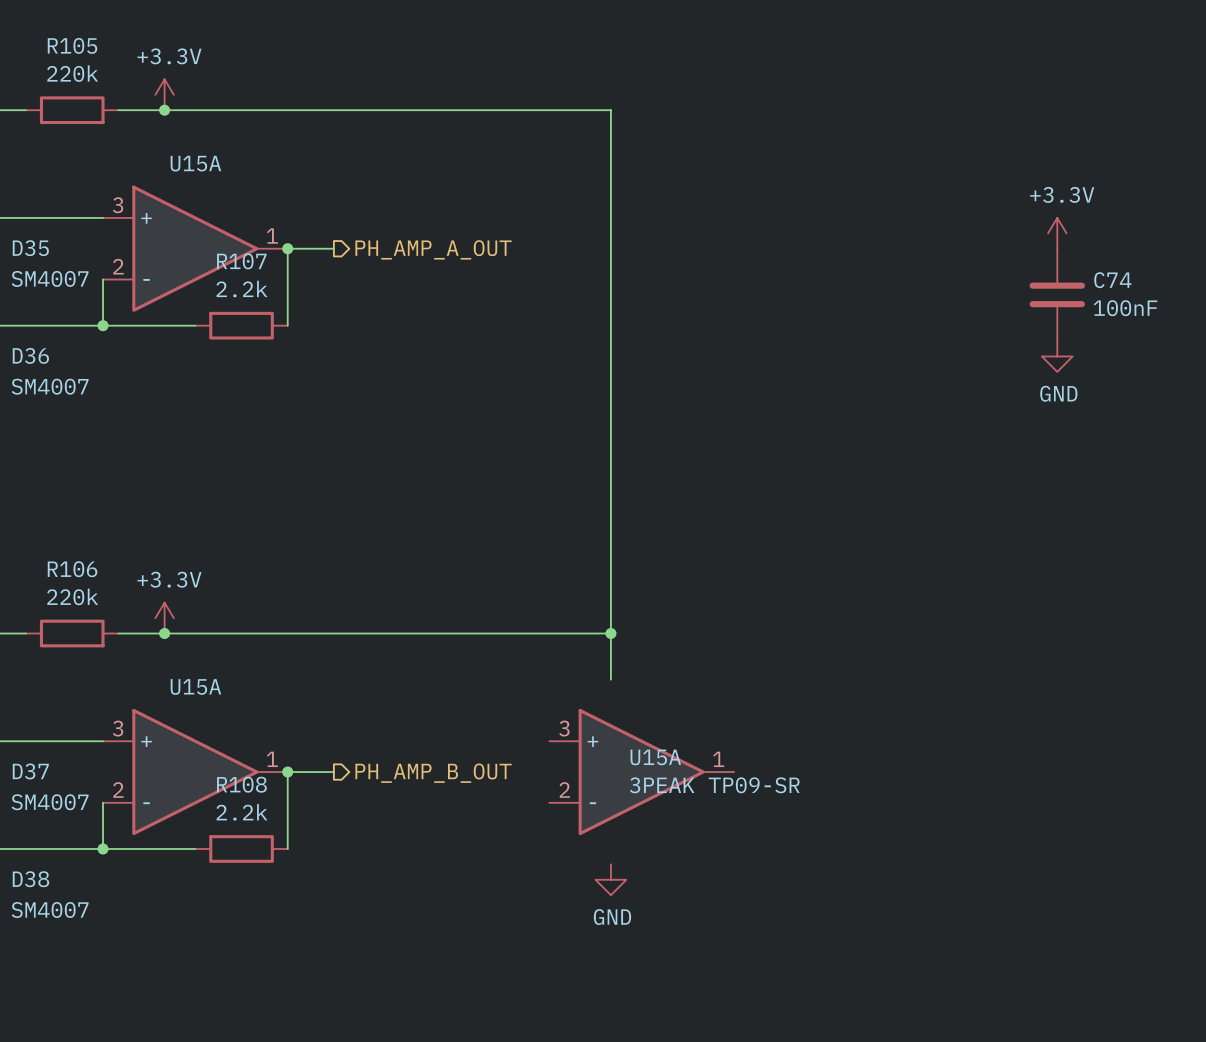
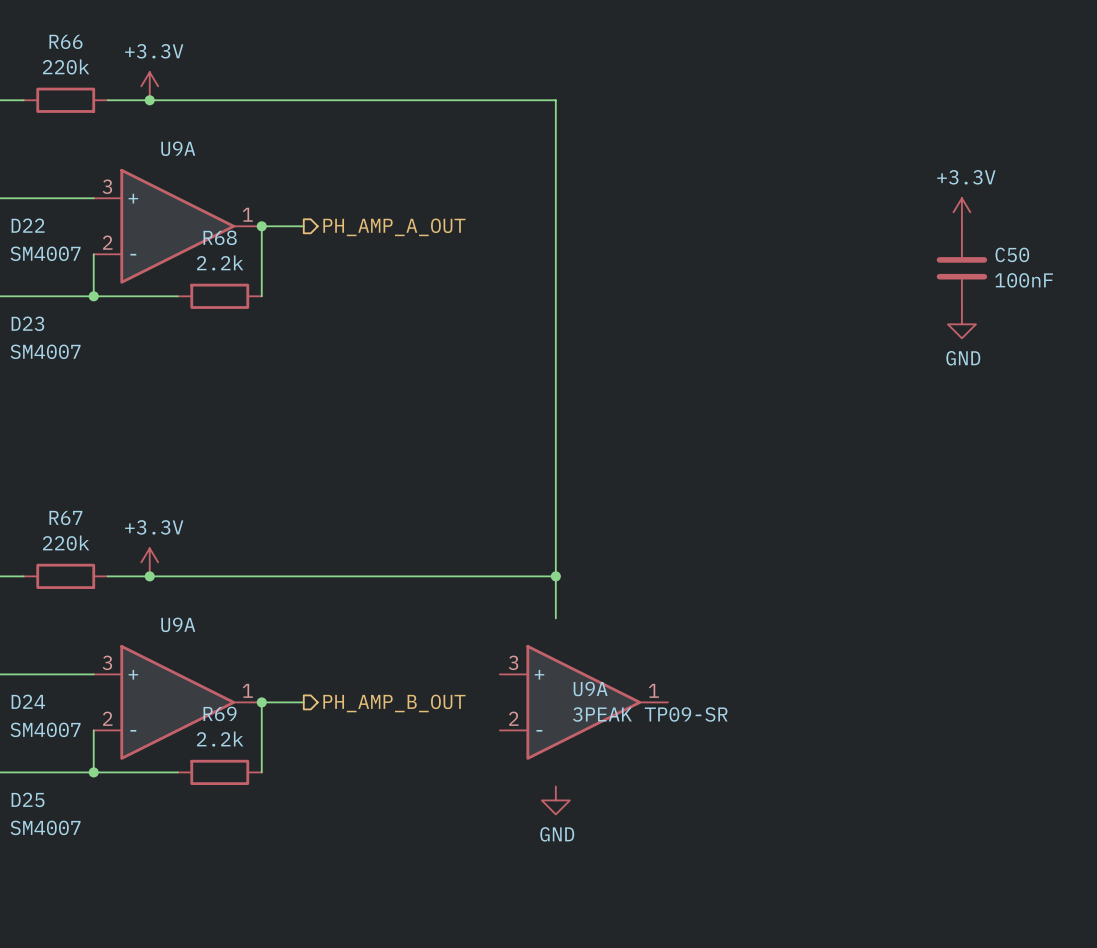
R105 name: R105 (72, 45) -> R66 (65, 41)
U15A name: U15A (195, 163) -> U9A (178, 148)
D35 name: D35 (30, 248) -> D22 (28, 225)
R107 name: R107 (241, 261) -> R68 (220, 237)
C74 name: C74 (1112, 280) -> C50 (1012, 254)
D36 name: D36 (30, 355) -> D23 (27, 323)
R106 name: R106 (72, 569) -> R67 (65, 518)
U15A name: U15A (195, 686) -> U9A (178, 624)
U15A name: U15A (655, 757) -> U9A (590, 689)
D37 name: D37 (30, 771) -> D24 (28, 701)
R108 name: R108 (241, 784) -> R69 (220, 713)
D38 name: D38 (30, 879) -> D25 (28, 799)

